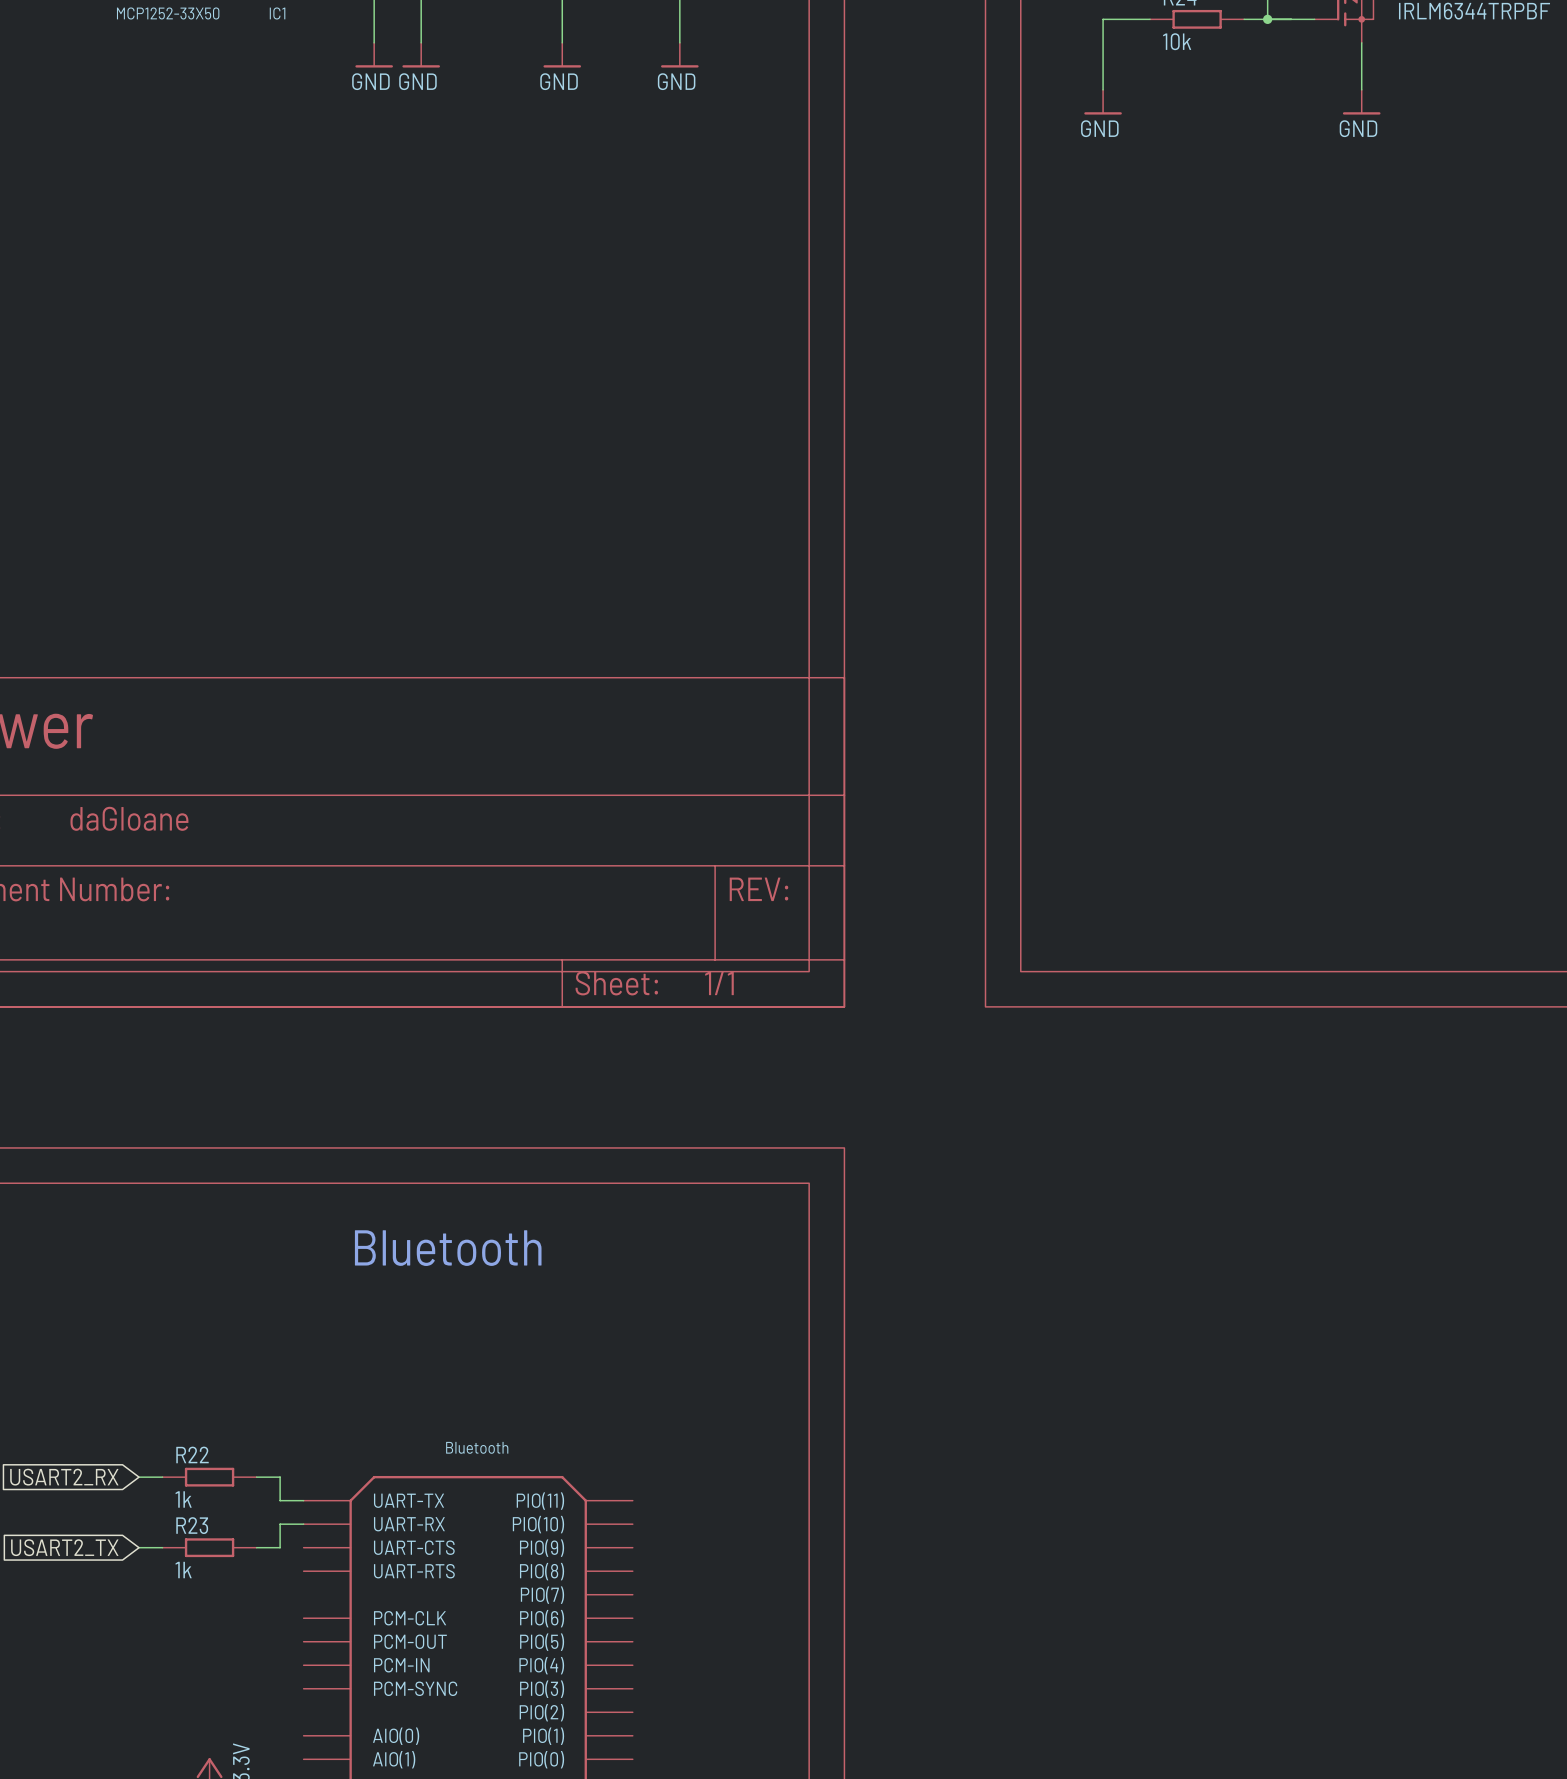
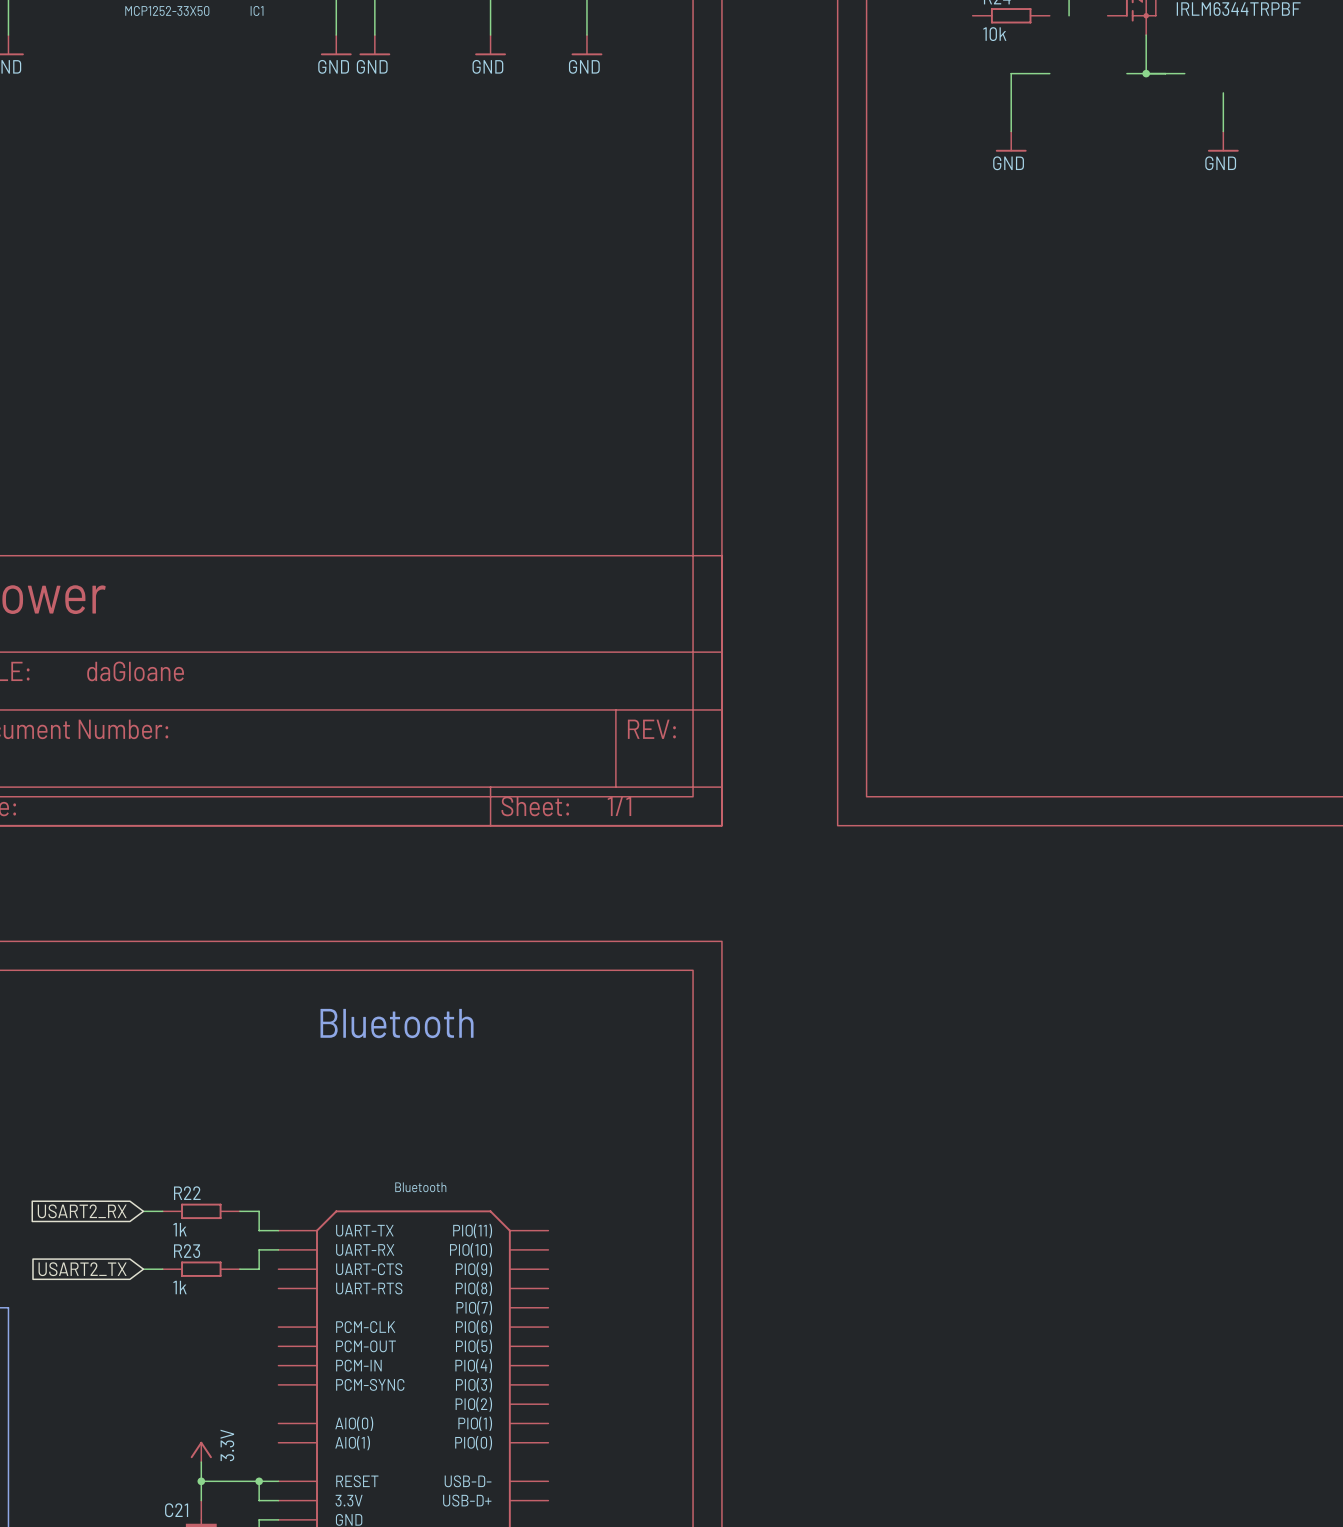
wire: (1150, 19) (1103, 19) (1103, 89) -> (1049, 73) (1011, 73) (1011, 131)
wire: (1244, 19) (1314, 19) -> (1126, 73) (1184, 73)
junction: (1267, 19) -> none
junction: none -> (1146, 73)
power symbol: GND (1103, 102) -> none
power symbol: GND (1361, 102) -> none
wire: none -> (1223, 92) (1223, 131)
power symbol: none -> GND (1011, 141)
power symbol: none -> GND (1223, 141)

